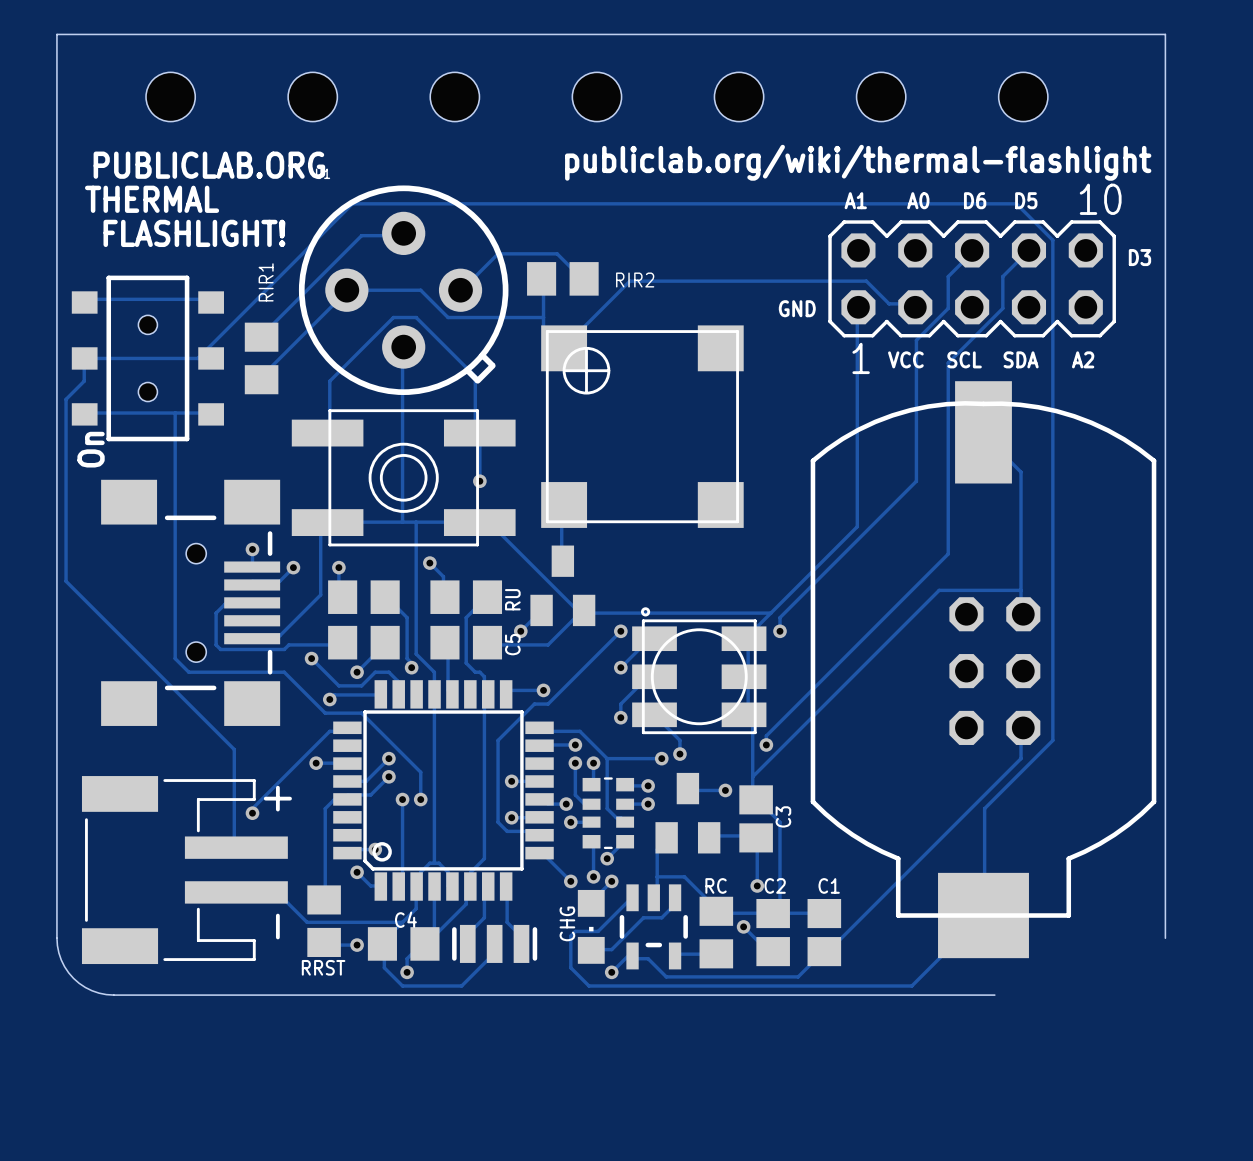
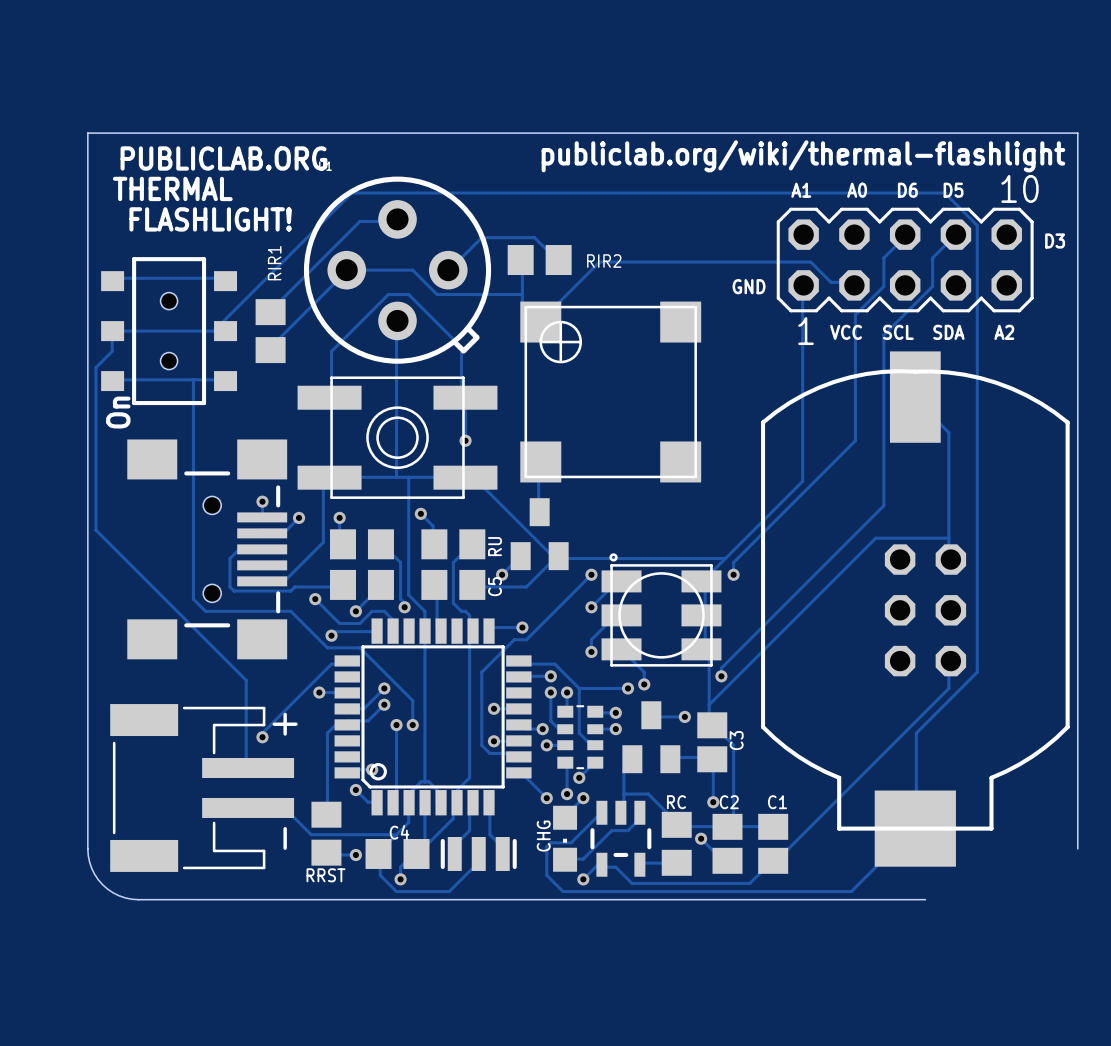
hole: (170, 96) -> none
hole: (312, 96) -> none
hole: (454, 96) -> none
hole: (596, 96) -> none
hole: (739, 96) -> none
hole: (881, 96) -> none
hole: (1023, 96) -> none
board edge: (56, 136) (56, 34) (1165, 34) (1165, 136) -> (87, 133) (1077, 133)

